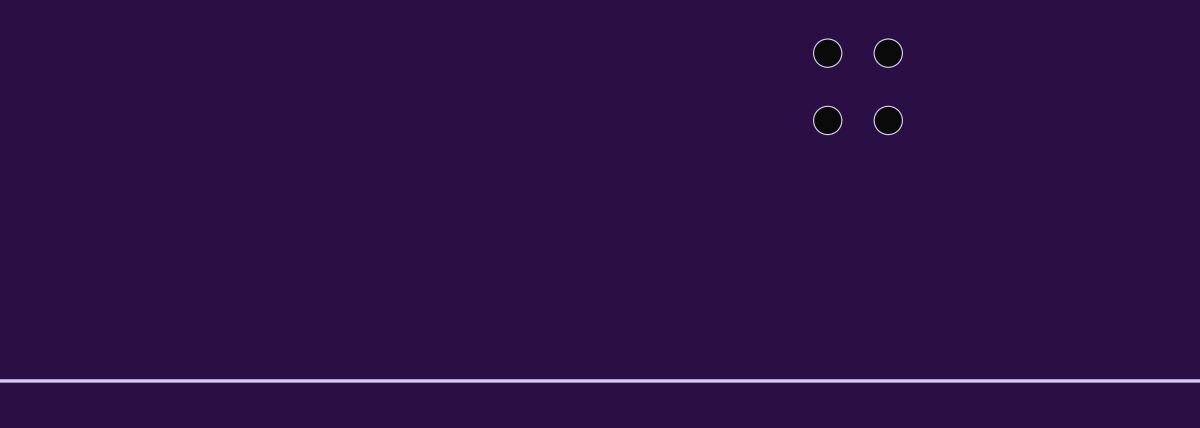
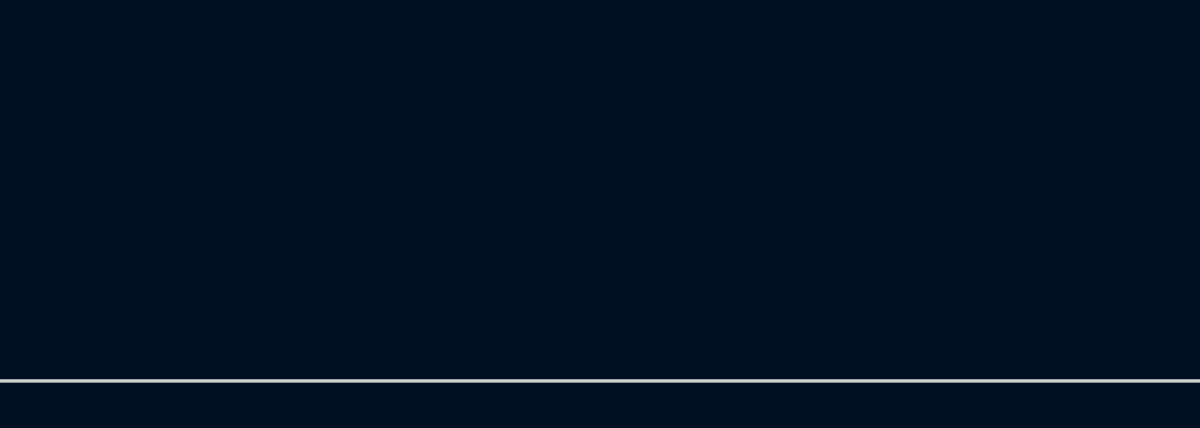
part: (827, 53) -> none
part: (888, 53) -> none
part: (827, 120) -> none
part: (888, 120) -> none

